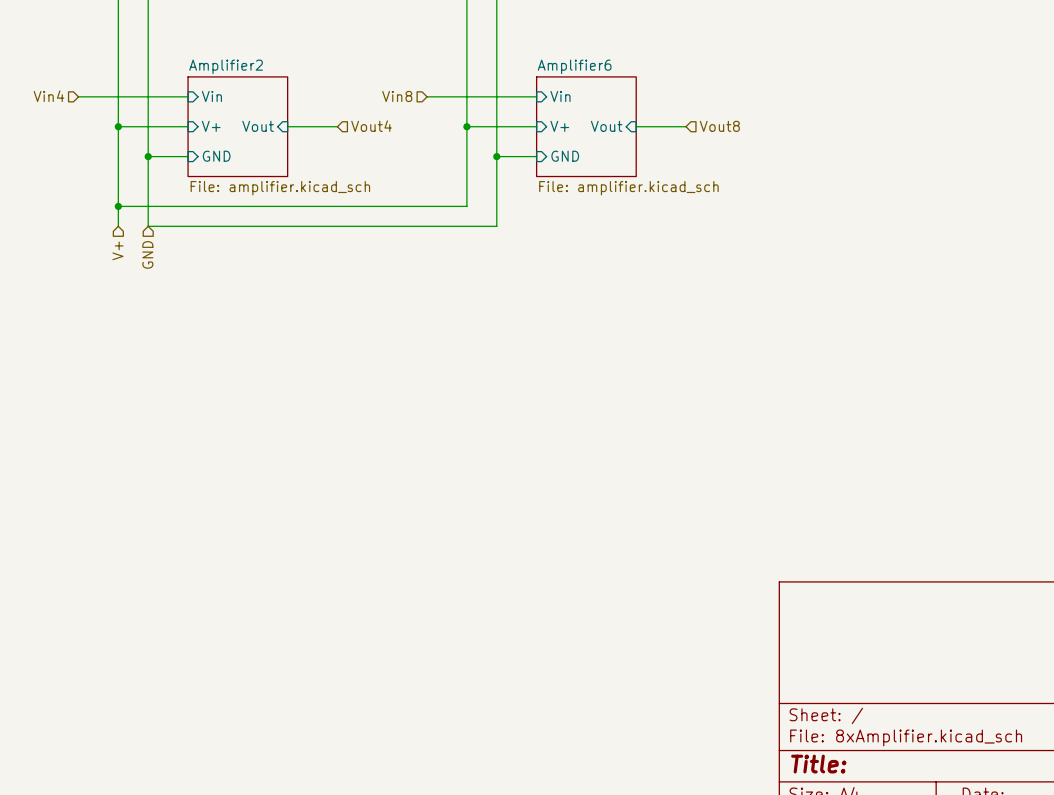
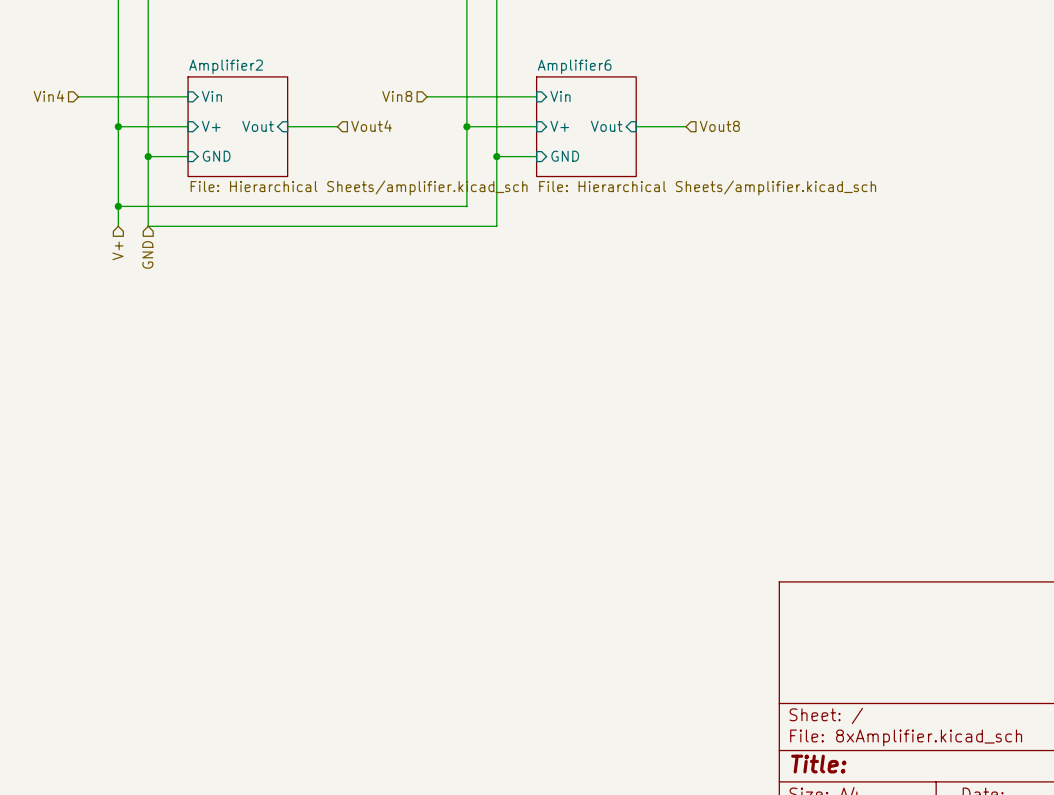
sheet Amplifier2 value: File: amplifier.kicad_sch (280, 188) -> File: Hierarchical Sheets/amplifier.kicad_sch (359, 187)
sheet Amplifier6 value: File: amplifier.kicad_sch (628, 188) -> File: Hierarchical Sheets/amplifier.kicad_sch (707, 187)

